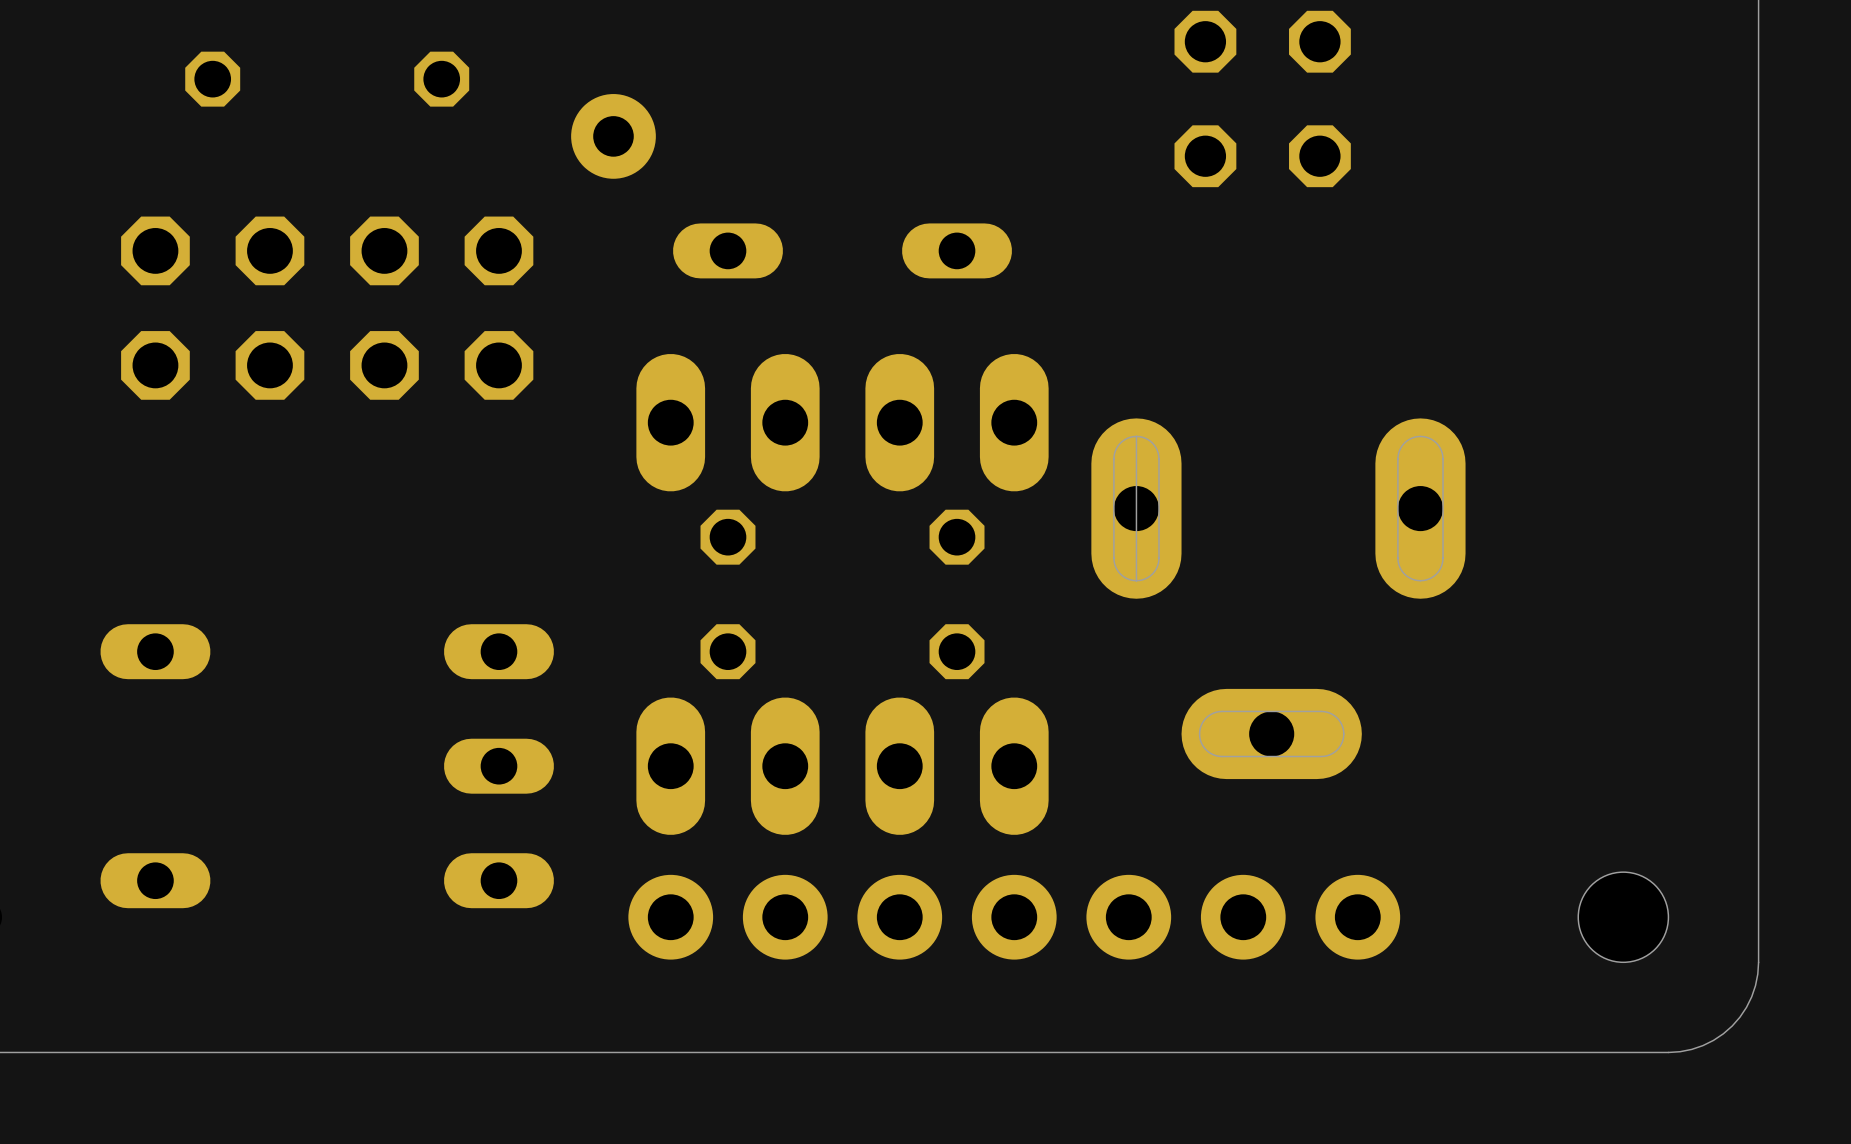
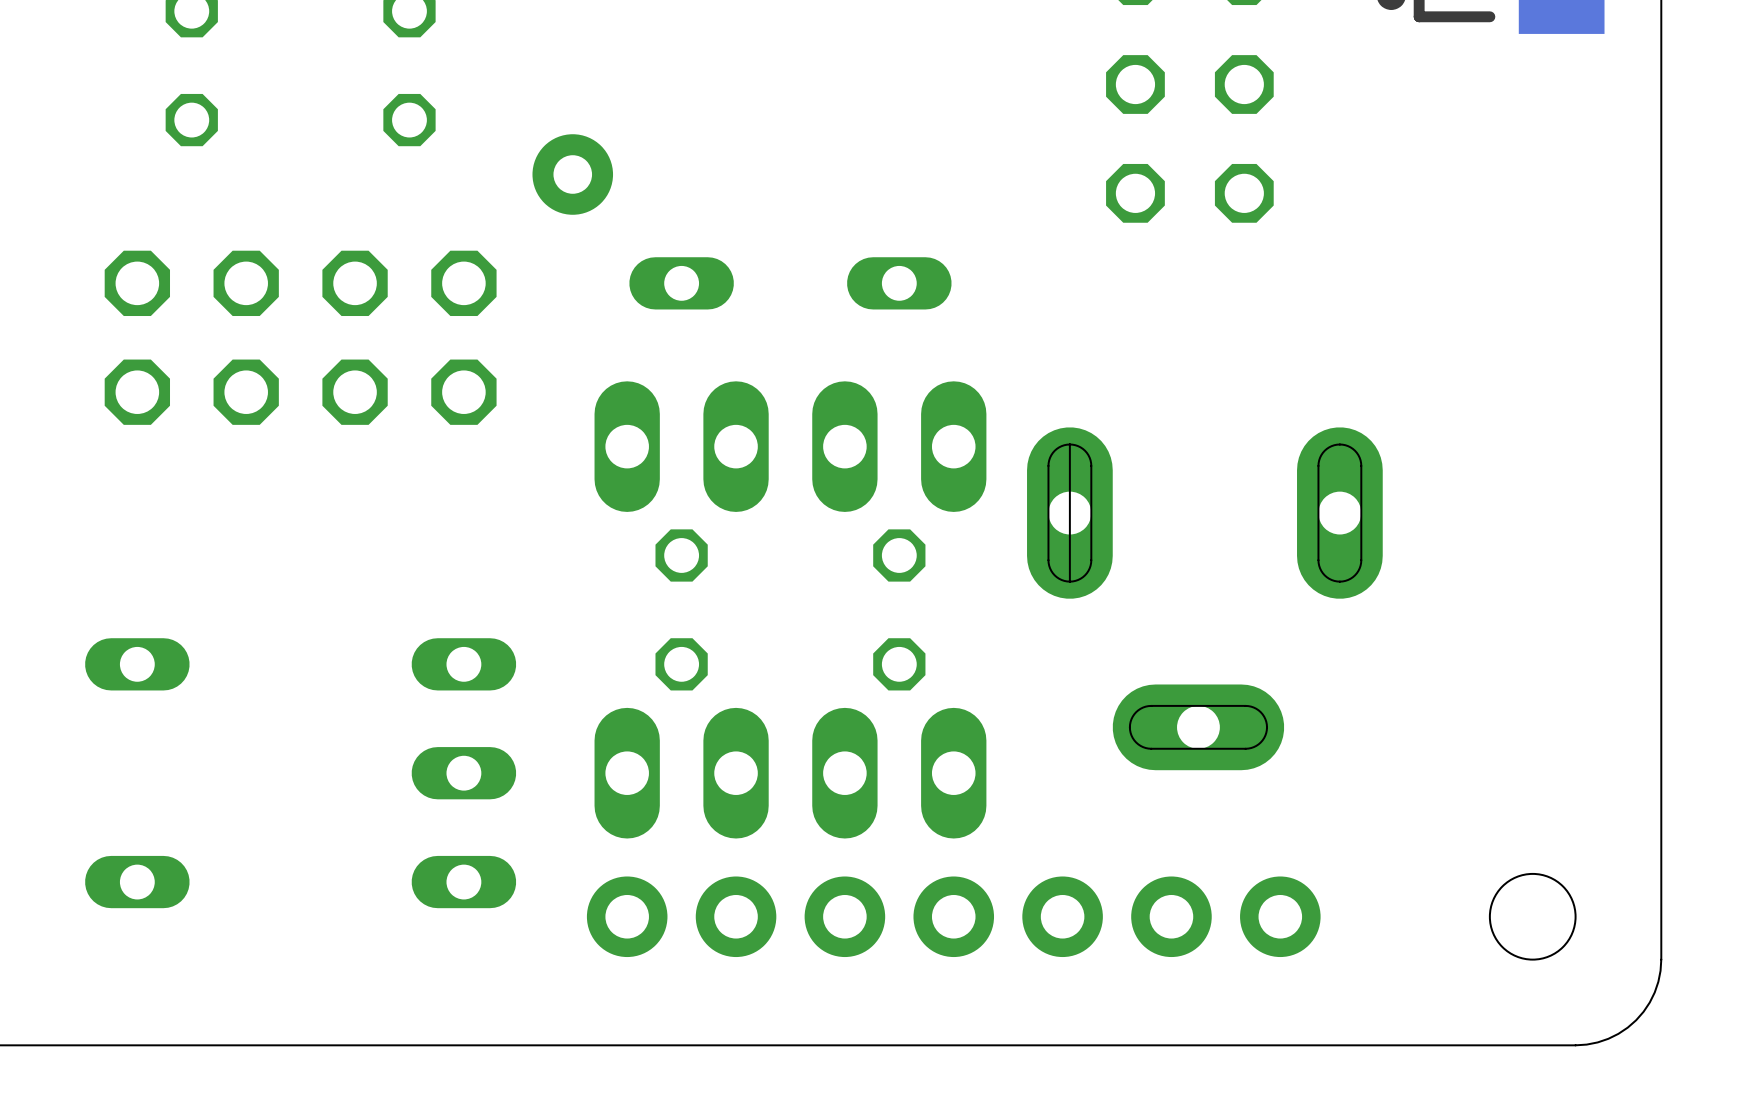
part position: (1278, 598) -> (1204, 598)

